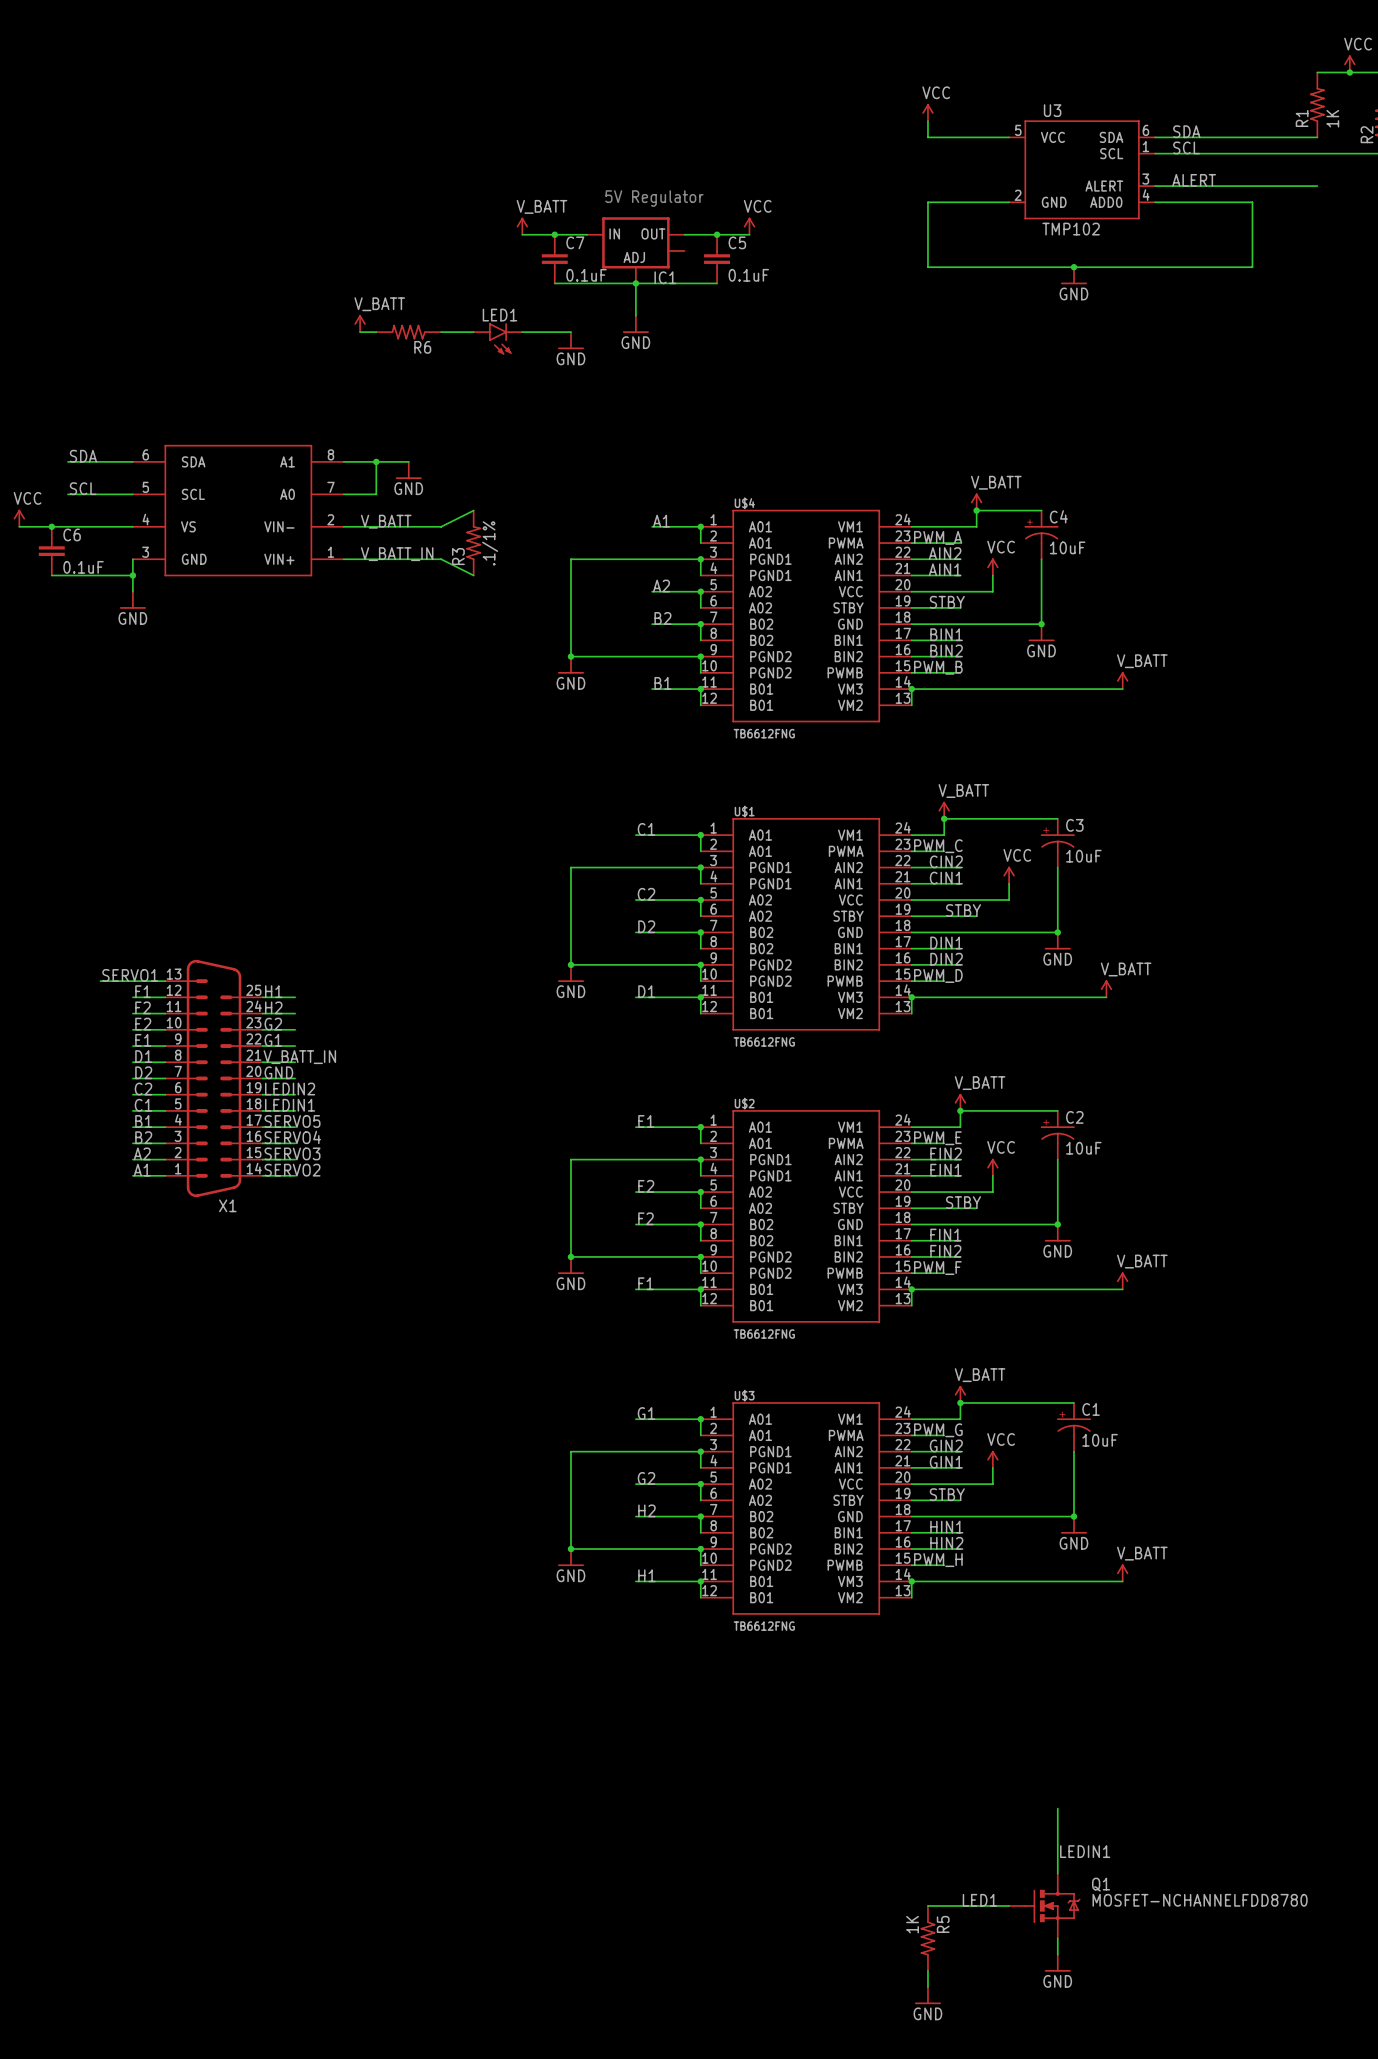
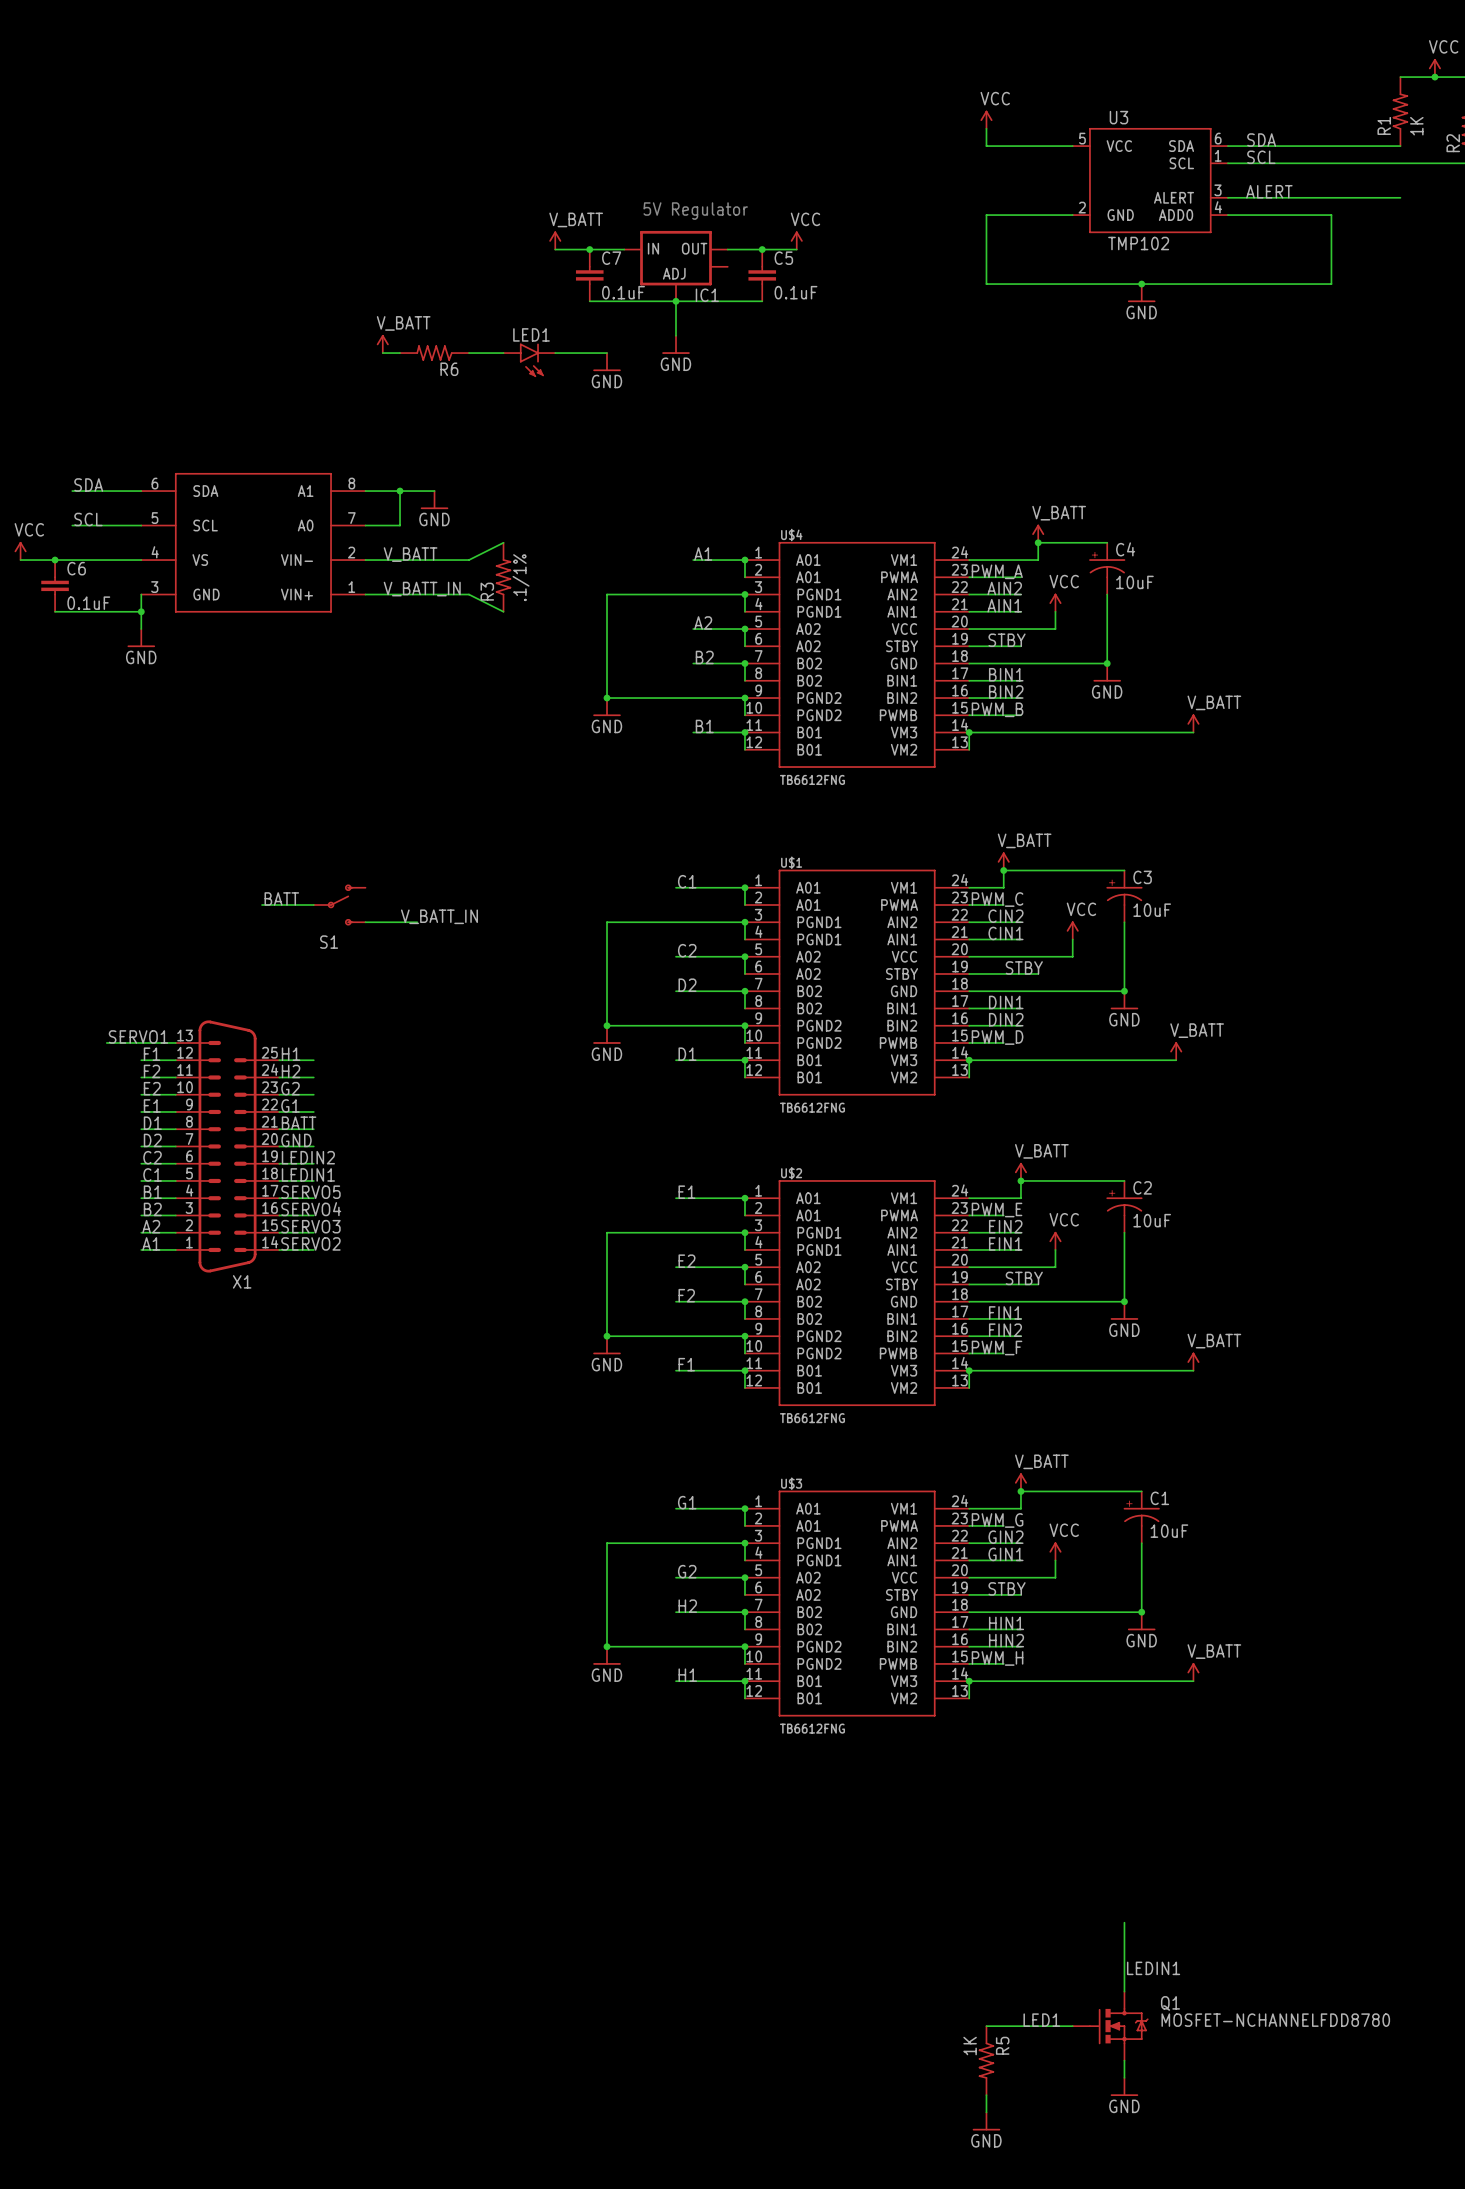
label: none -> BATT (281, 898)
wire: none -> (262, 905) (313, 905)
S1: none -> (339, 905)
label: none -> V_BATT_IN (439, 916)
wire: none -> (365, 922) (417, 922)
label: V_BATT_IN (299, 1057) -> BATT (299, 1123)

